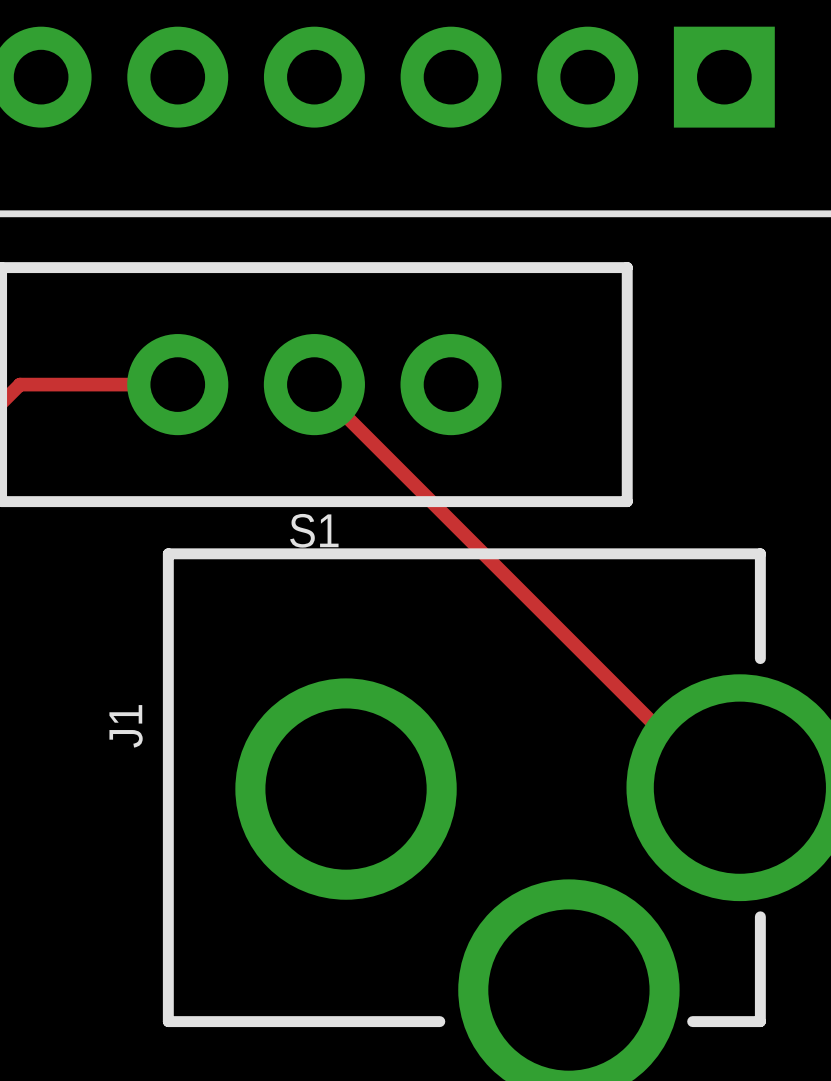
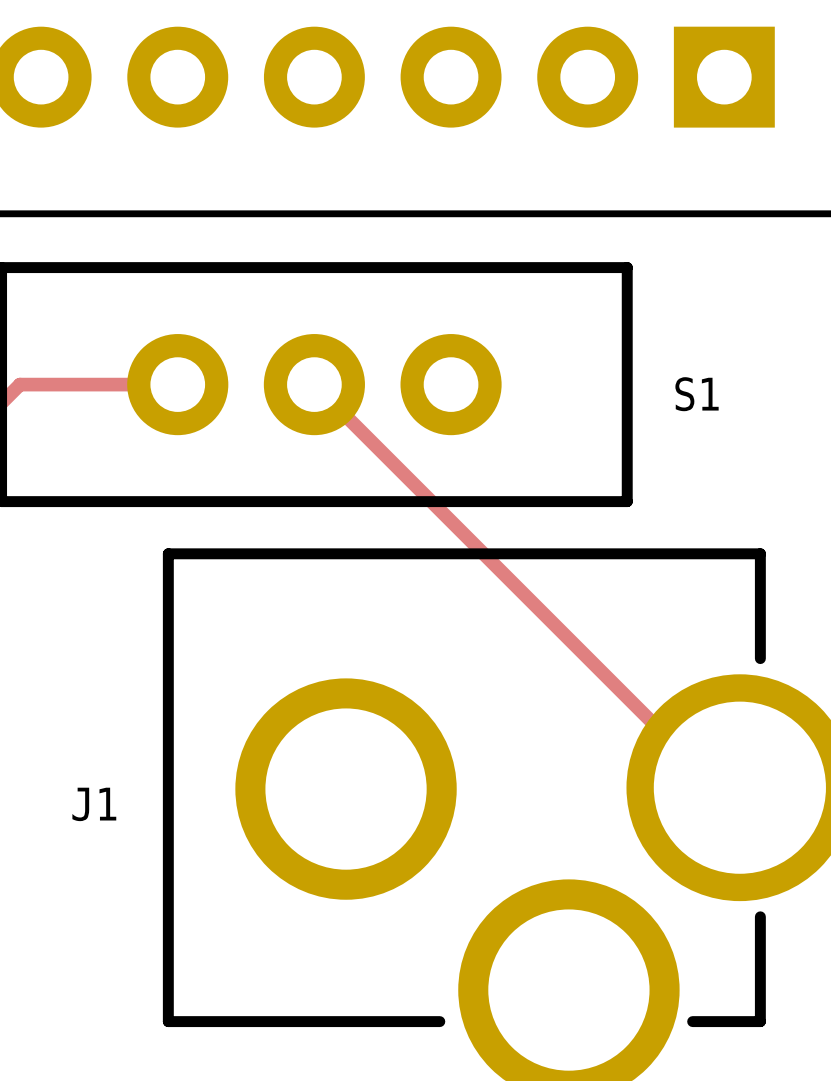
S1 name position: S1 (314, 530) -> S1 (697, 394)
J1 name rotation: 0° (126, 726) -> 90° clockwise (94, 804)
J1 name position: J1 (126, 726) -> J1 (94, 804)

